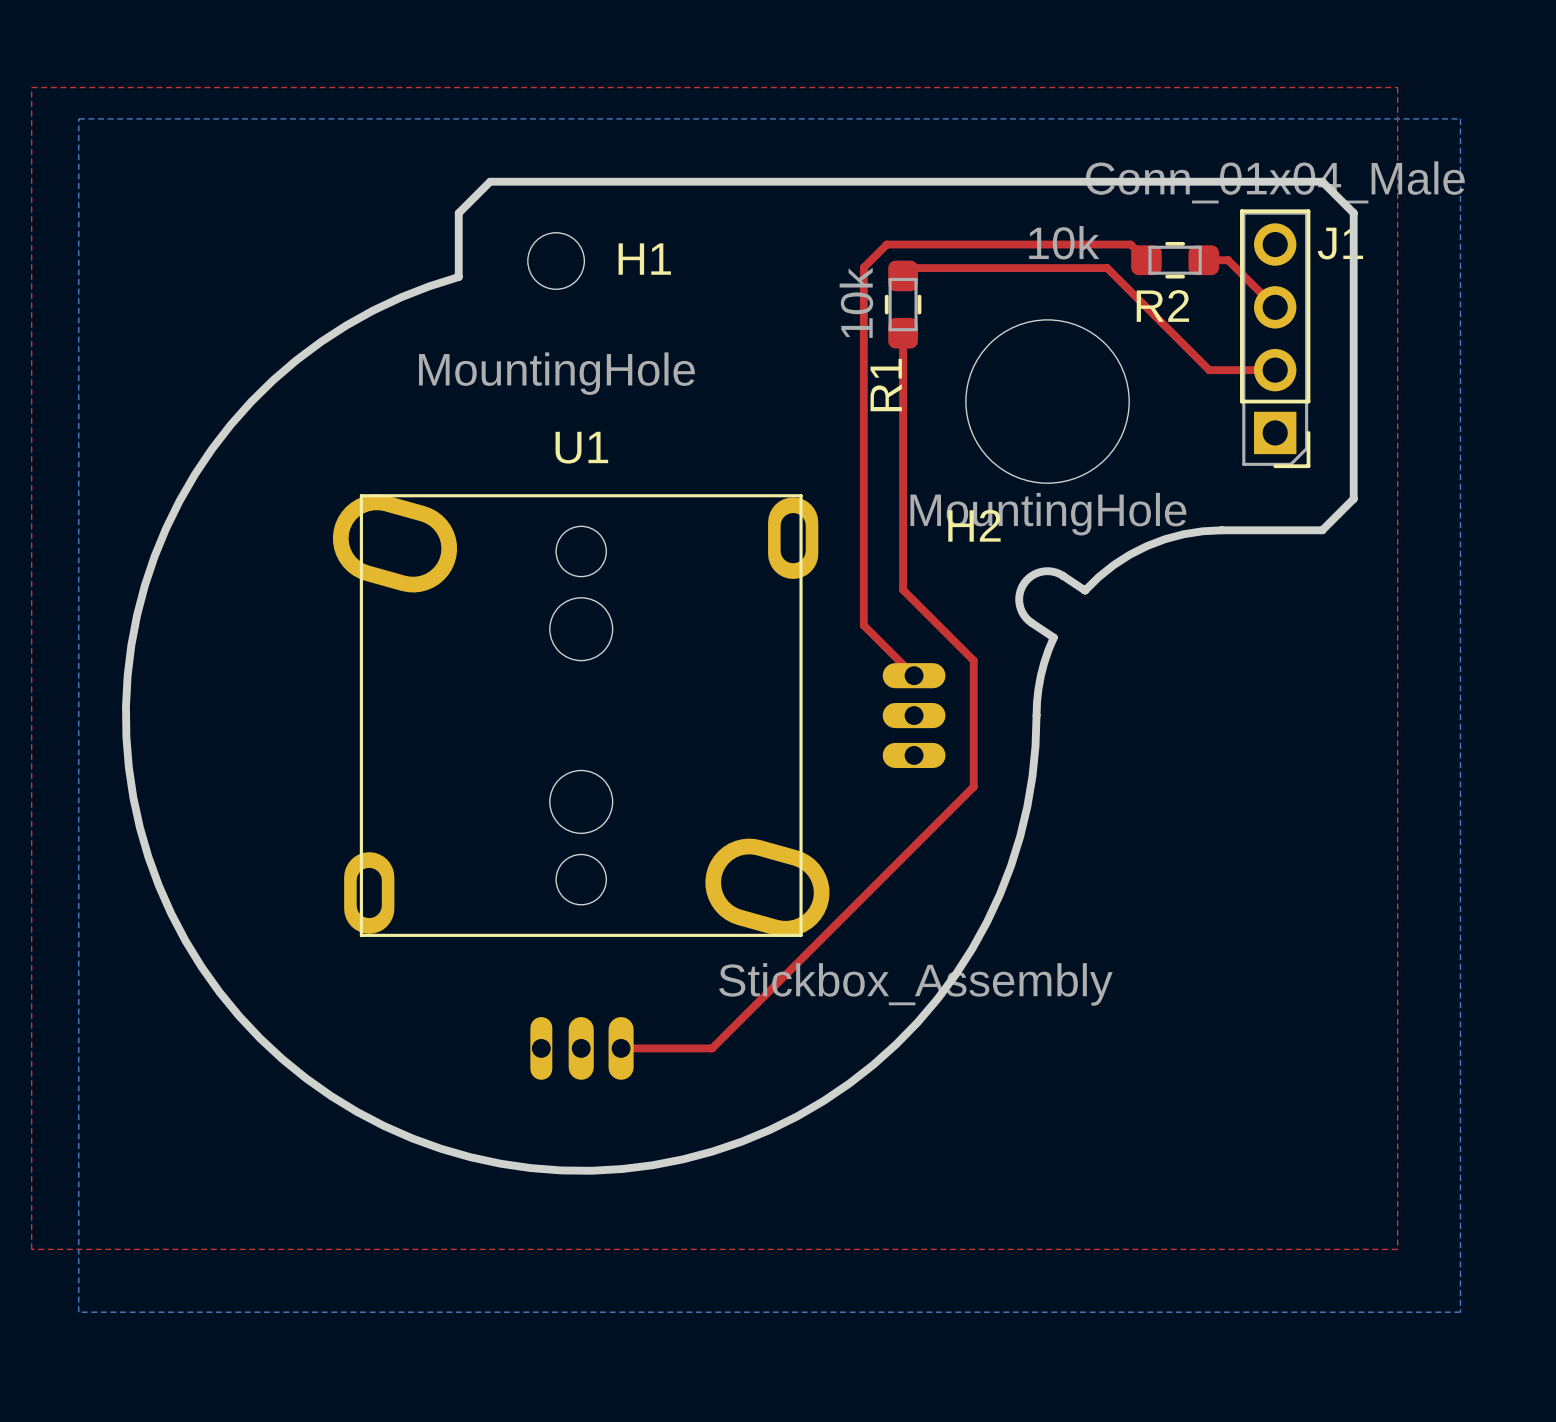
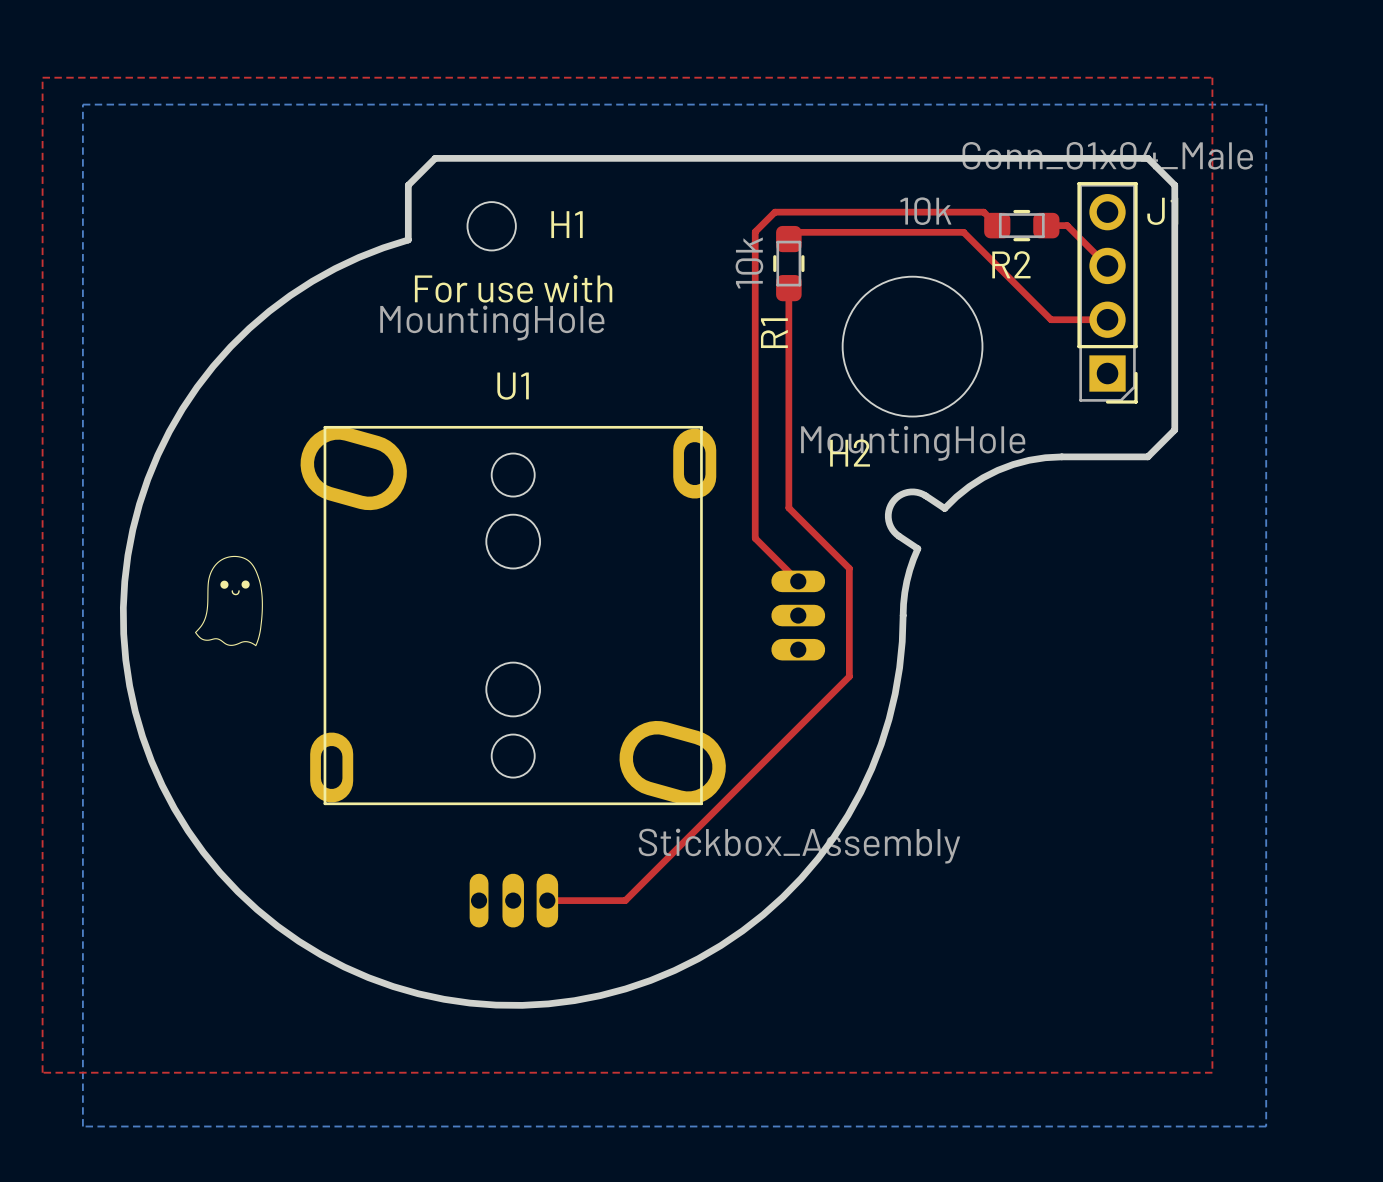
text: none -> For use with (513, 288)
drawing: none -> [194, 555, 263, 647]

